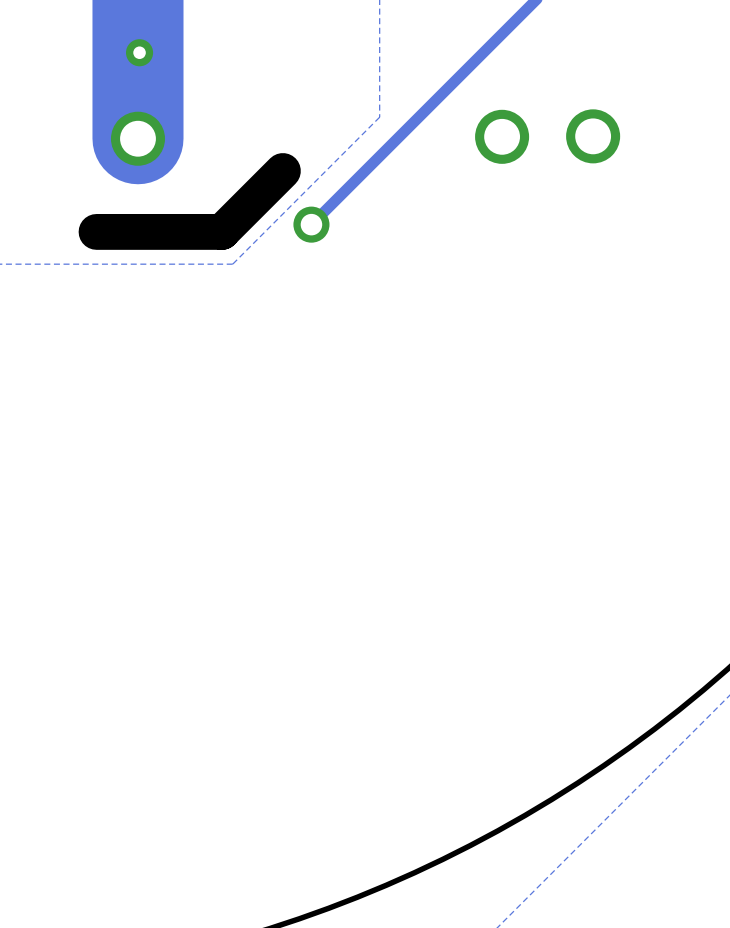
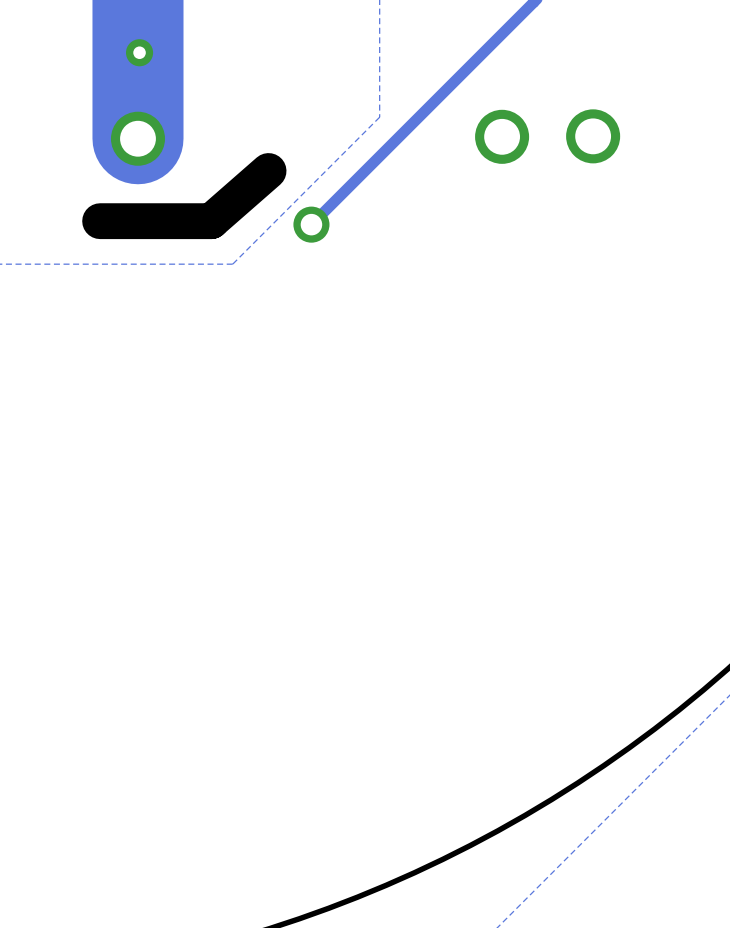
board edge: none -> (268, 170) (211, 221) (100, 221)
board edge: (282, 170) (221, 231) (96, 231) -> none

